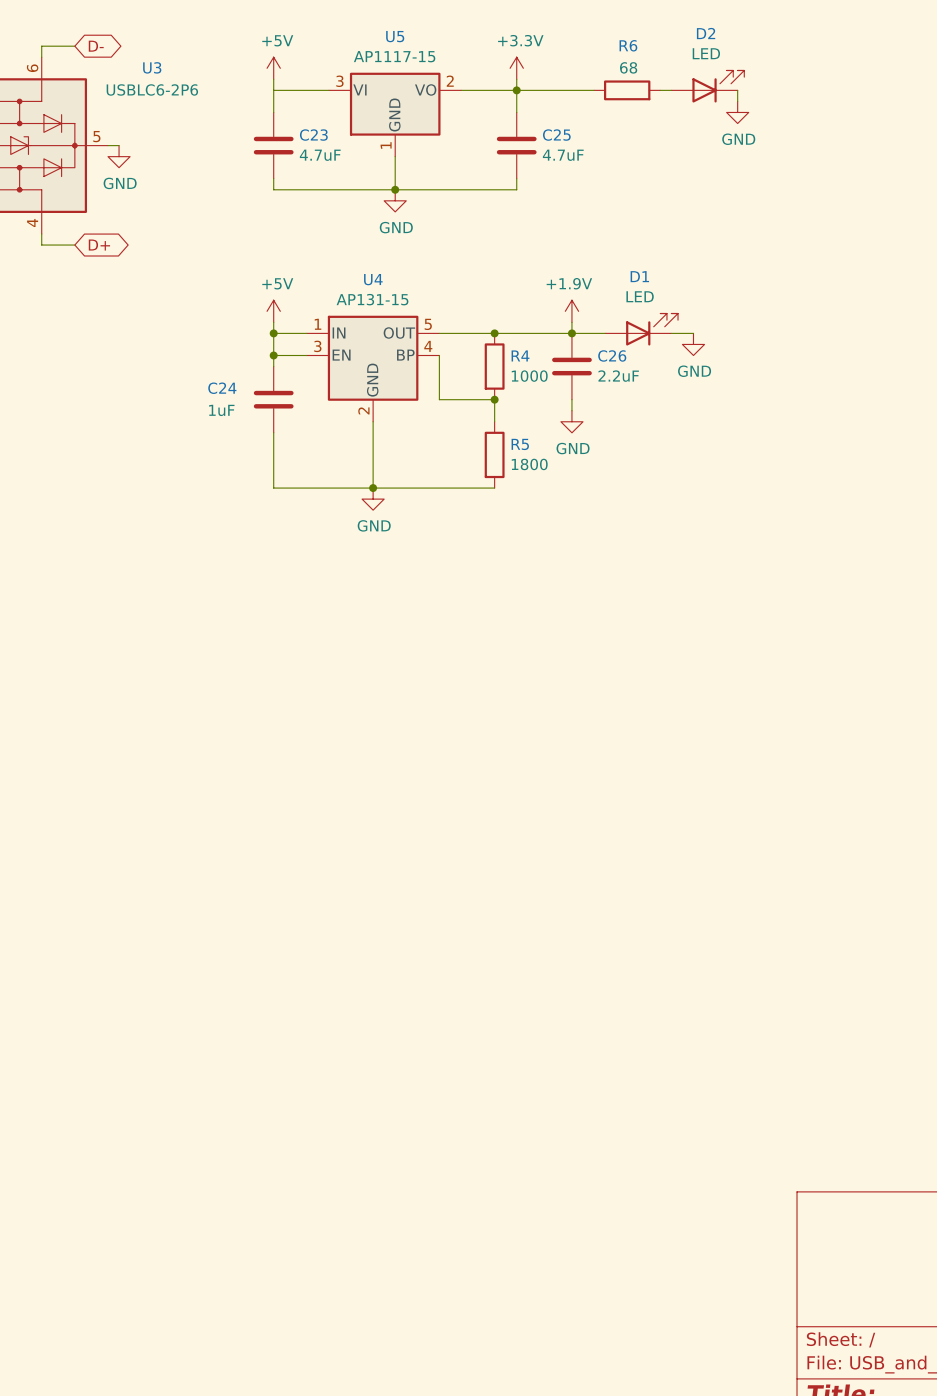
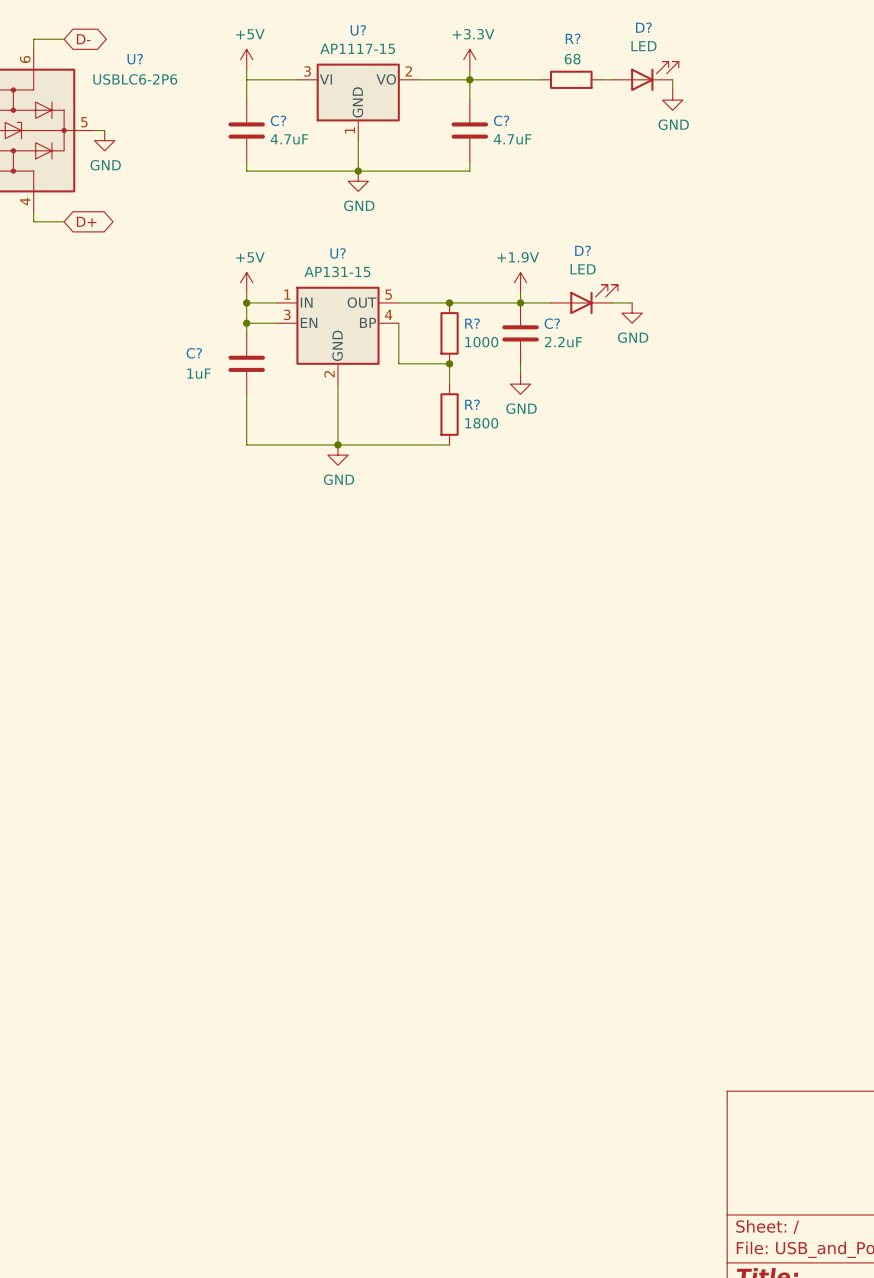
D2 name: D2 (706, 33) -> D? (643, 27)
U5 name: U5 (395, 36) -> U? (358, 30)
R6 name: R6 (628, 45) -> R? (573, 38)
U3 name: U3 (152, 67) -> U? (135, 59)
C23 name: C23 (313, 135) -> C? (278, 120)
C25 name: C25 (556, 135) -> C? (501, 120)
D1 name: D1 (639, 276) -> D? (583, 250)
U4 name: U4 (373, 279) -> U? (338, 253)
R4 name: R4 (520, 355) -> R? (472, 323)
C26 name: C26 (612, 355) -> C? (552, 323)
C24 name: C24 (222, 388) -> C? (194, 353)
R5 name: R5 (520, 444) -> R? (472, 404)

